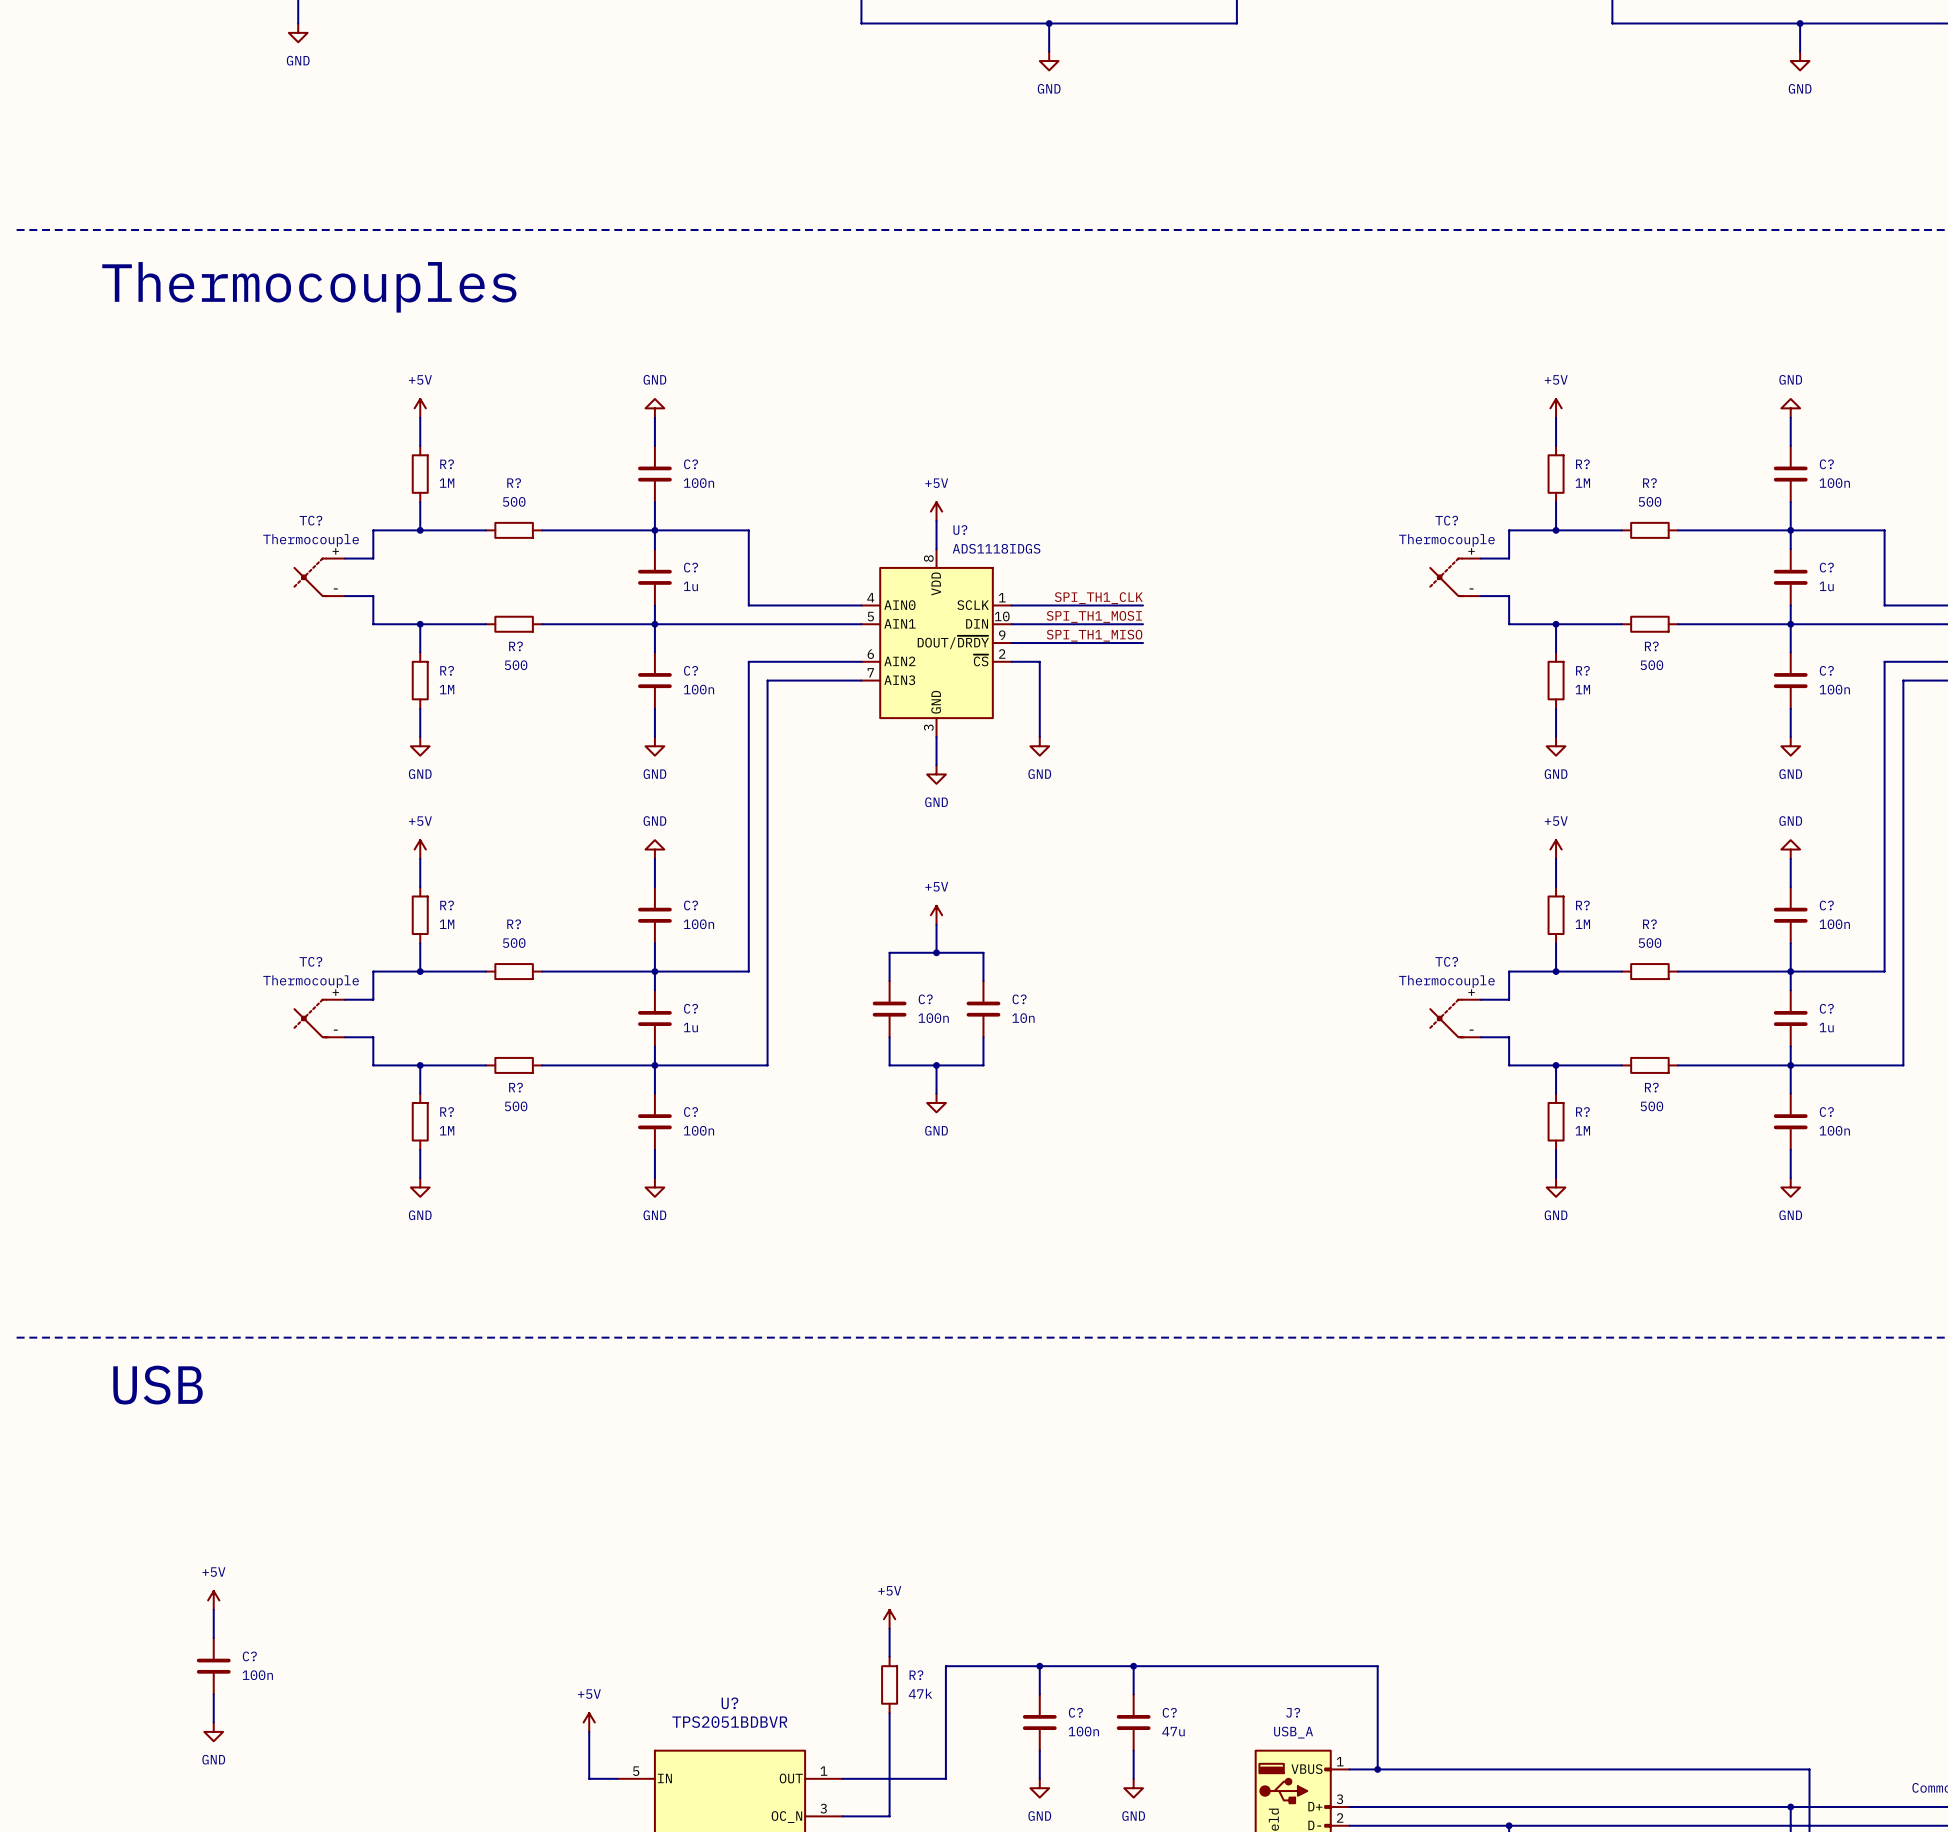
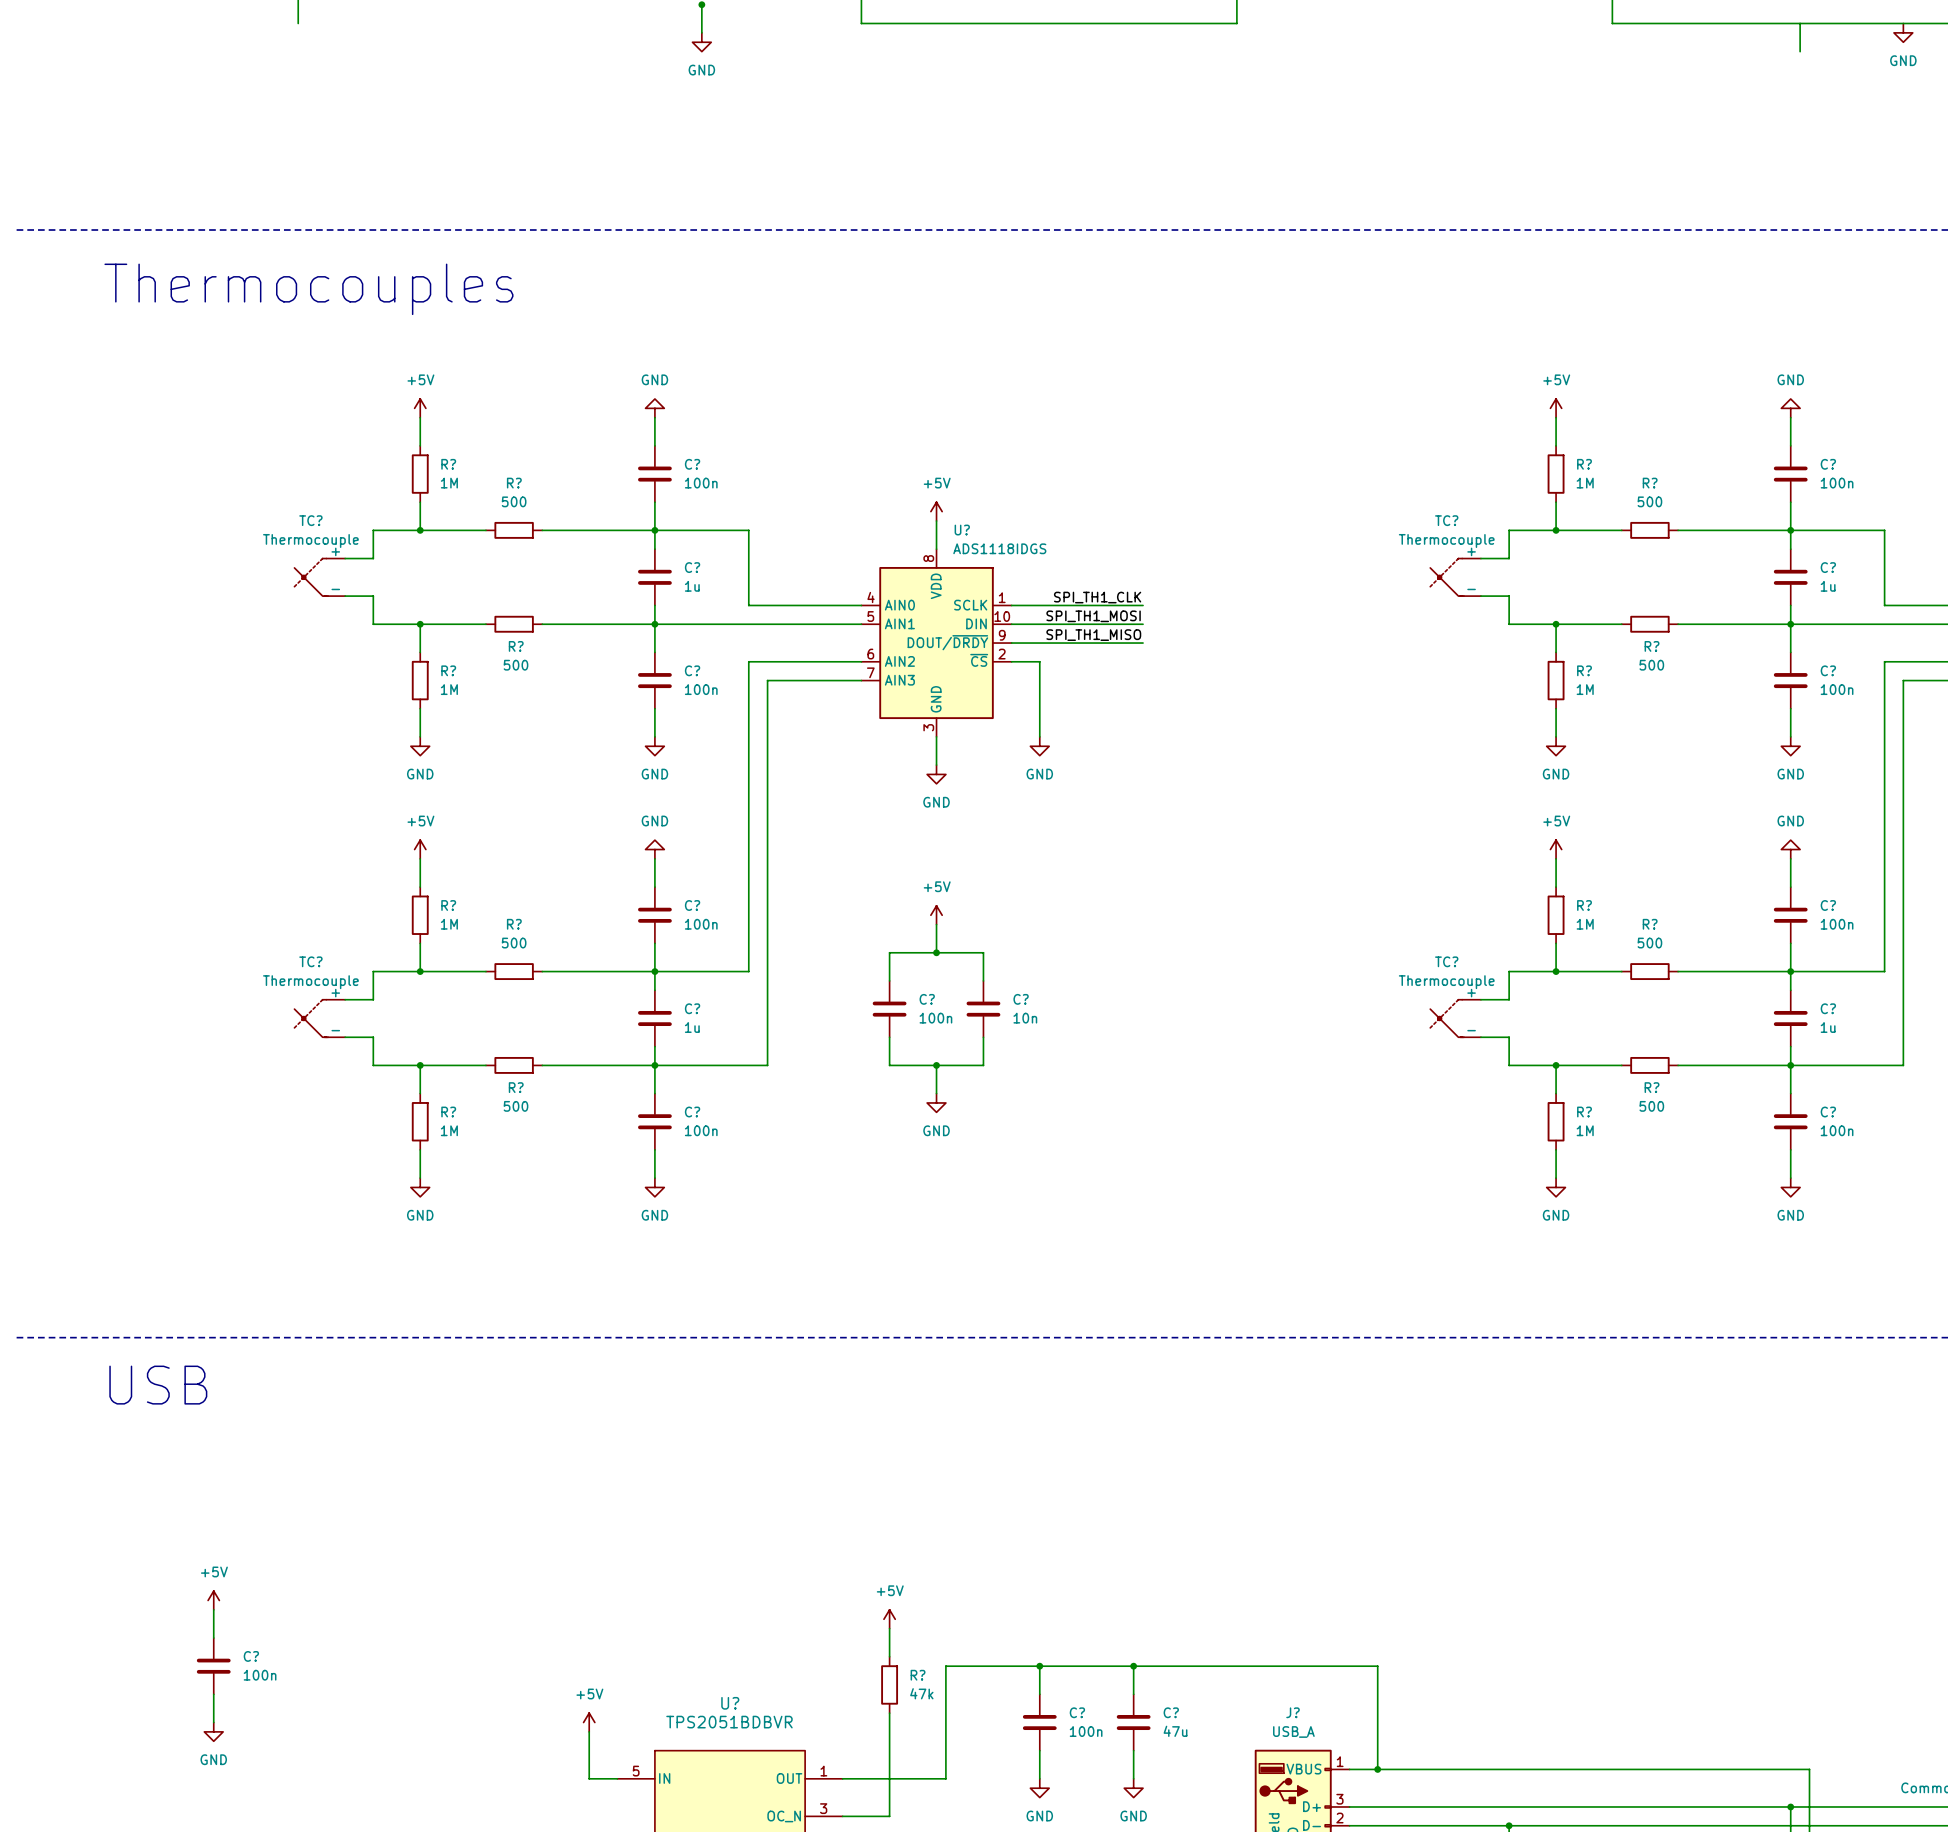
wire: none -> (701, 4) (701, 32)
junction: none -> (701, 4)
wire: (1049, 23) (1049, 51) -> none
junction: (1049, 23) -> none
junction: (1800, 23) -> none
power symbol: GND (298, 32) -> none
power symbol: none -> GND (701, 42)
power symbol: GND (1049, 61) -> none
power symbol position: GND (1800, 61) -> GND (1903, 32)

